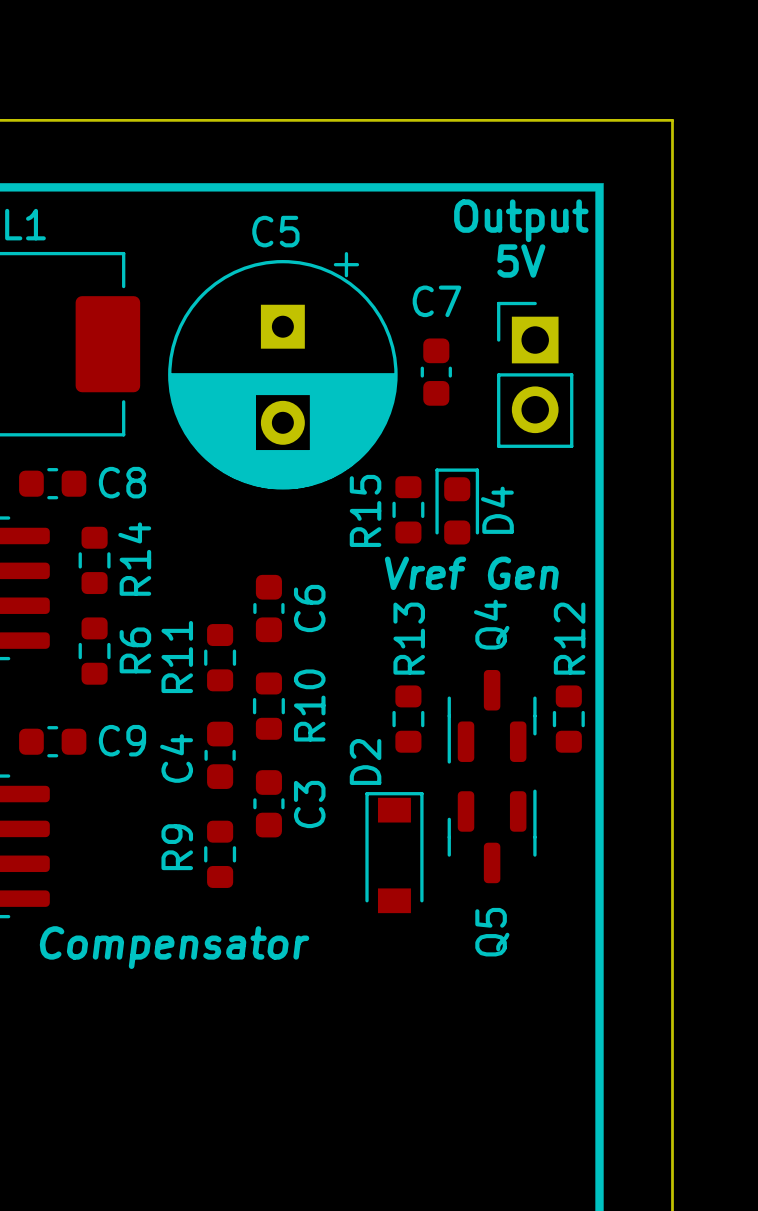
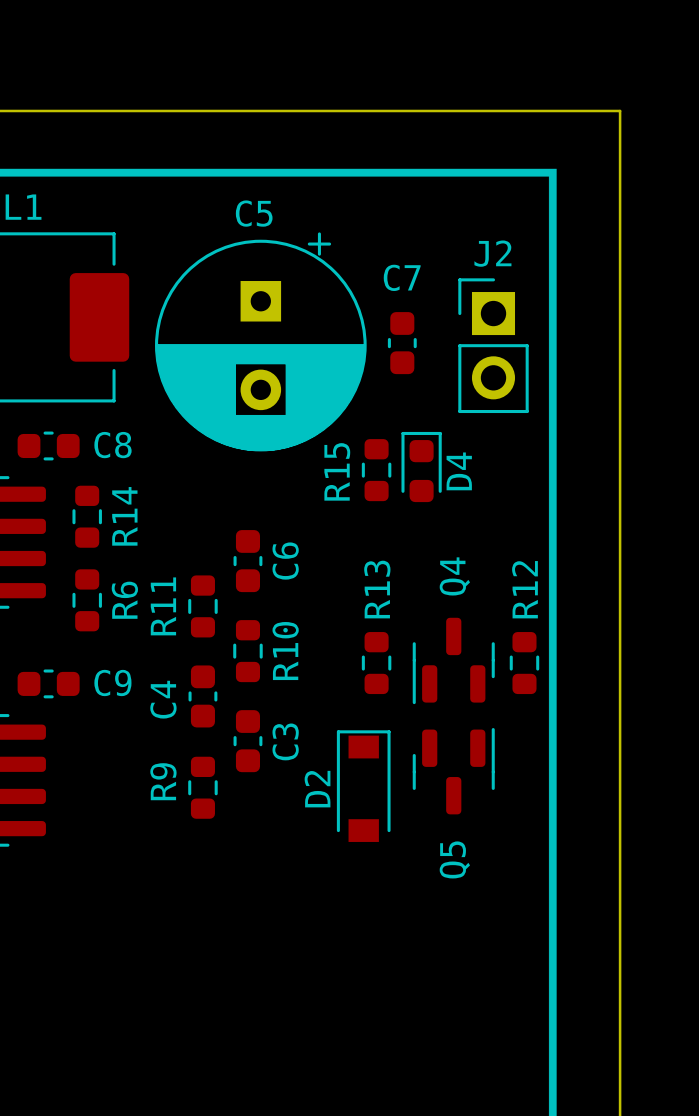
text: Output (521, 220) -> none
text: 5V (521, 261) -> none
J2 name: none -> J2 (492, 253)
text: Vref Gen (471, 573) -> none
D2 name position: D2 (365, 761) -> D2 (317, 789)
text: Compensator (174, 947) -> none

